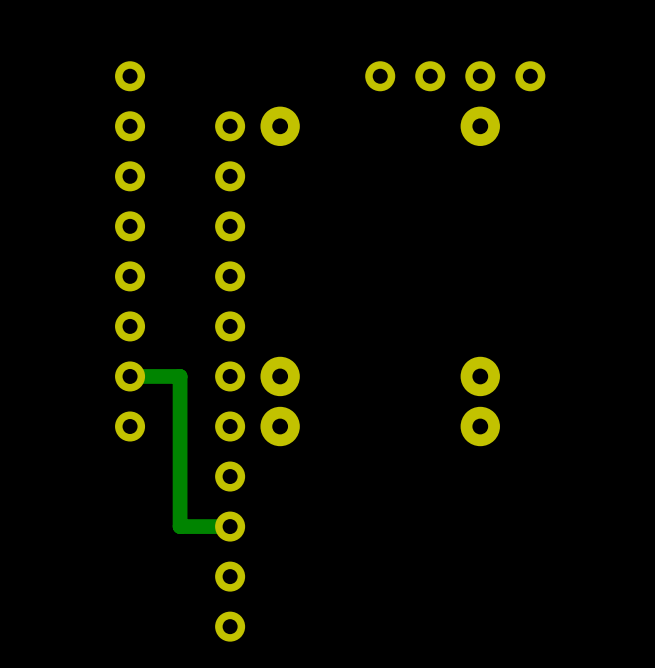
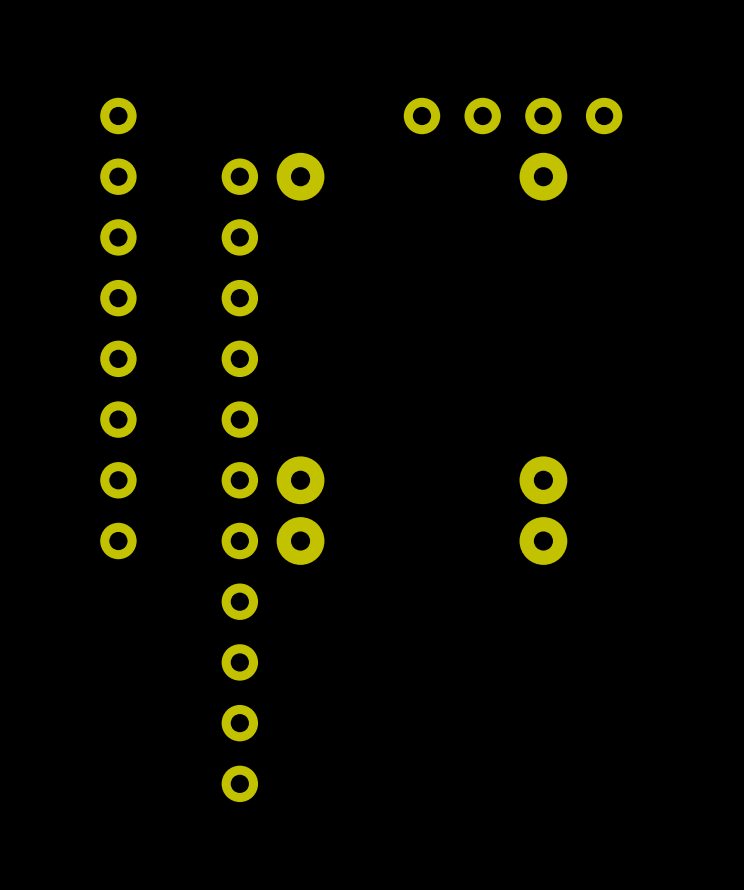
track: (130, 376) (180, 376) (180, 526) (230, 526) -> none

